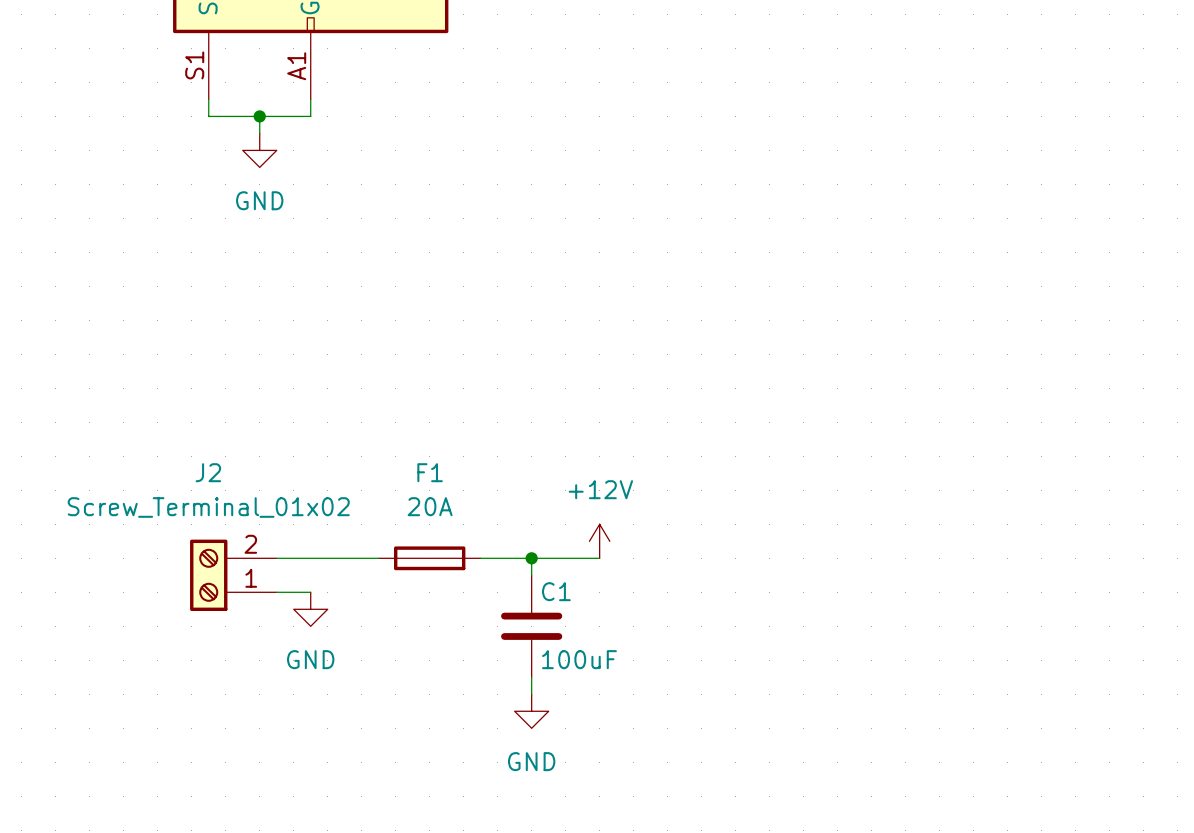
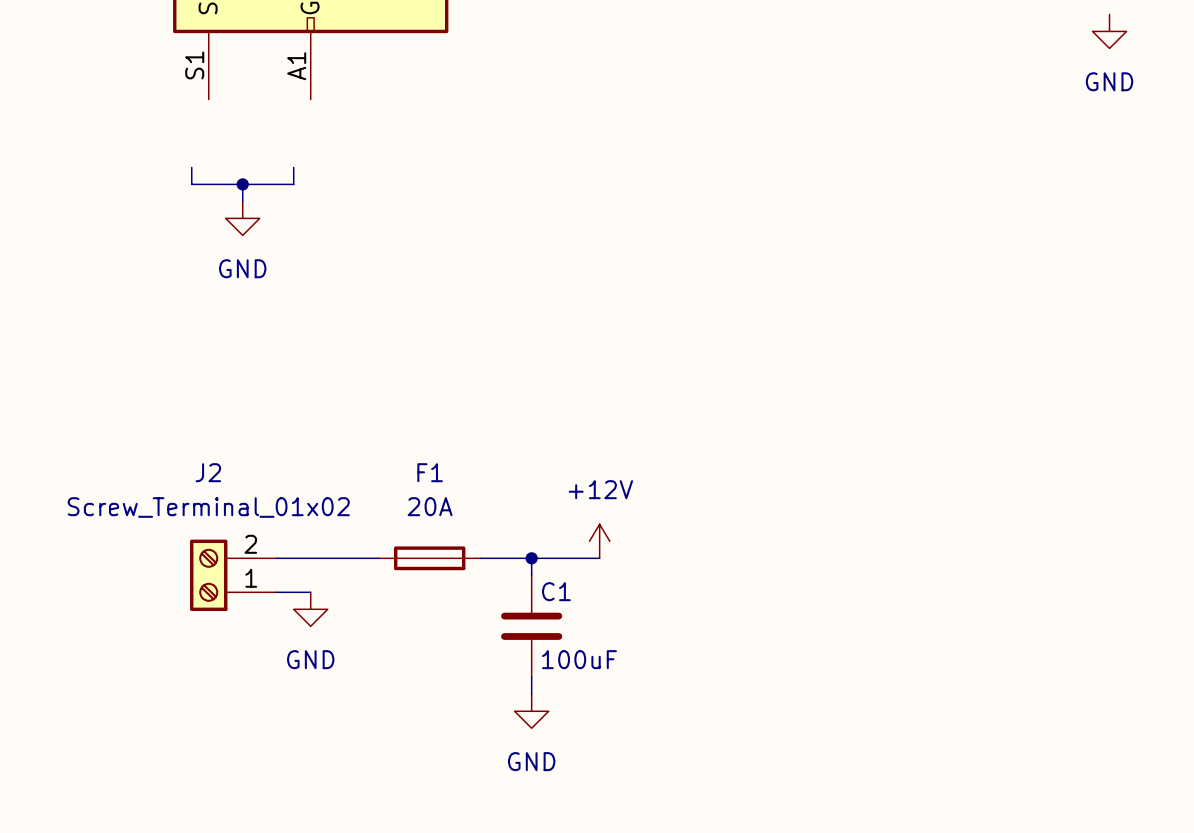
power symbol: none -> GND (1109, 31)
wire: (208, 99) (208, 116) (310, 116) (310, 99) -> (191, 167) (191, 184) (293, 184) (293, 167)
wire: (259, 116) (259, 133) -> (242, 184) (242, 201)
junction position: (259, 116) -> (242, 184)
power symbol position: GND (259, 150) -> GND (242, 218)

